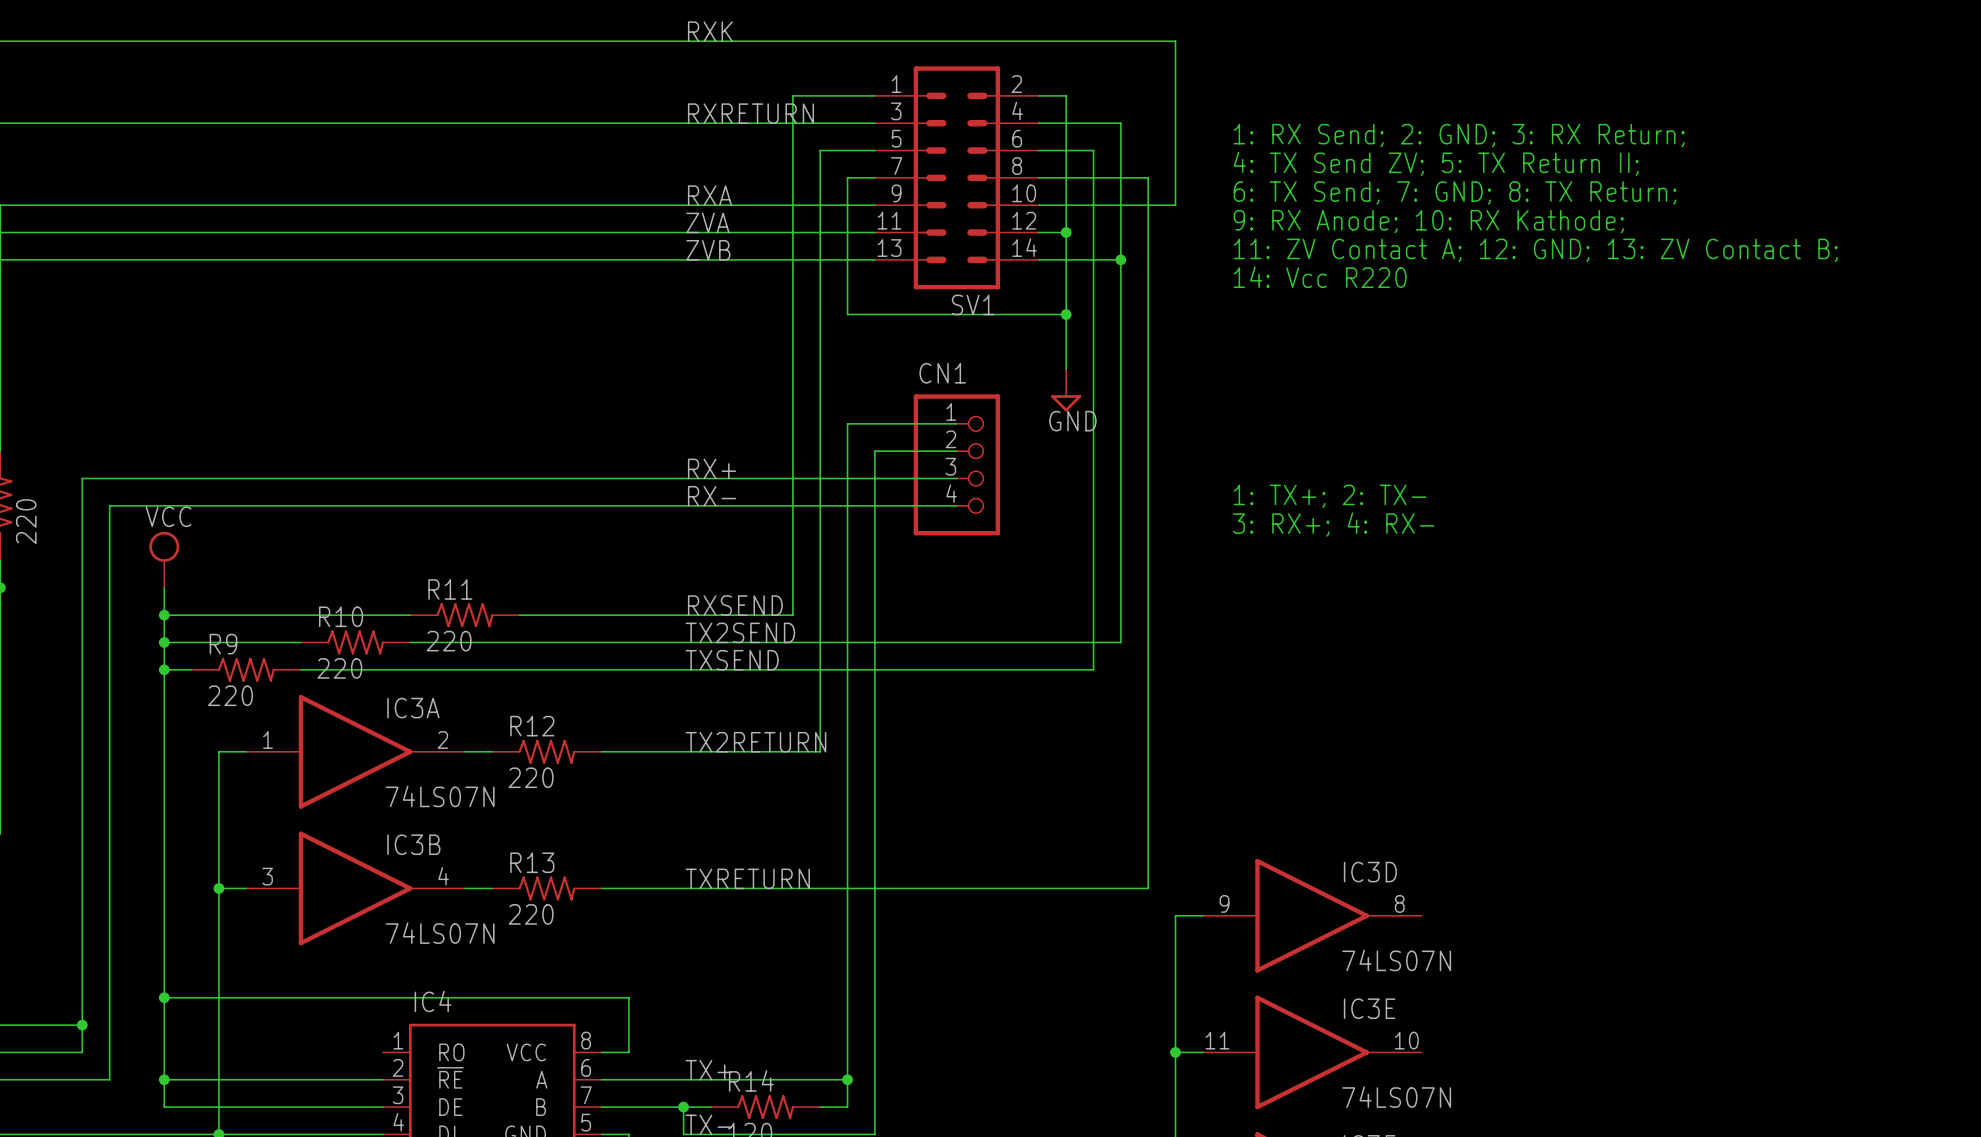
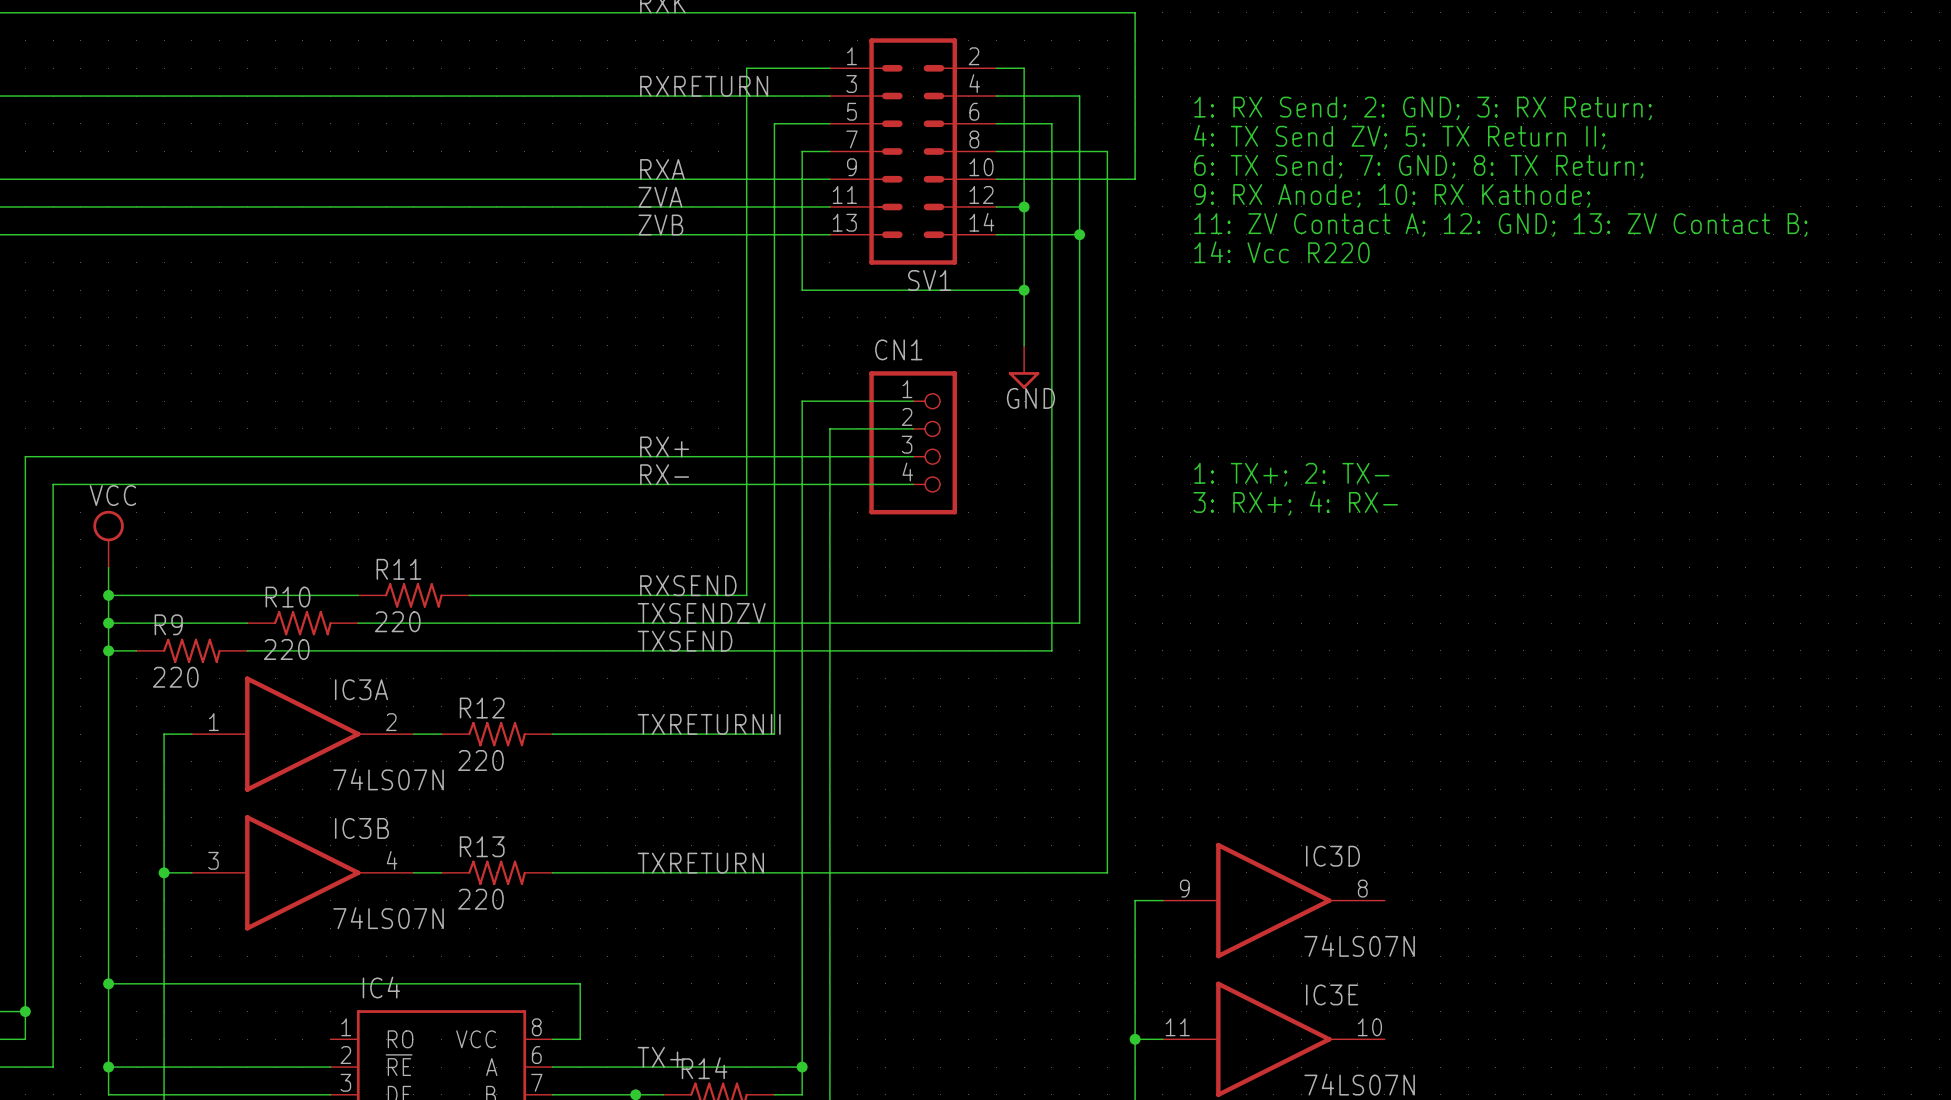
label: TX2SEND (740, 632) -> TXSENDZV (701, 613)
label: TX2RETURN (755, 742) -> TXRETURNII (709, 724)

